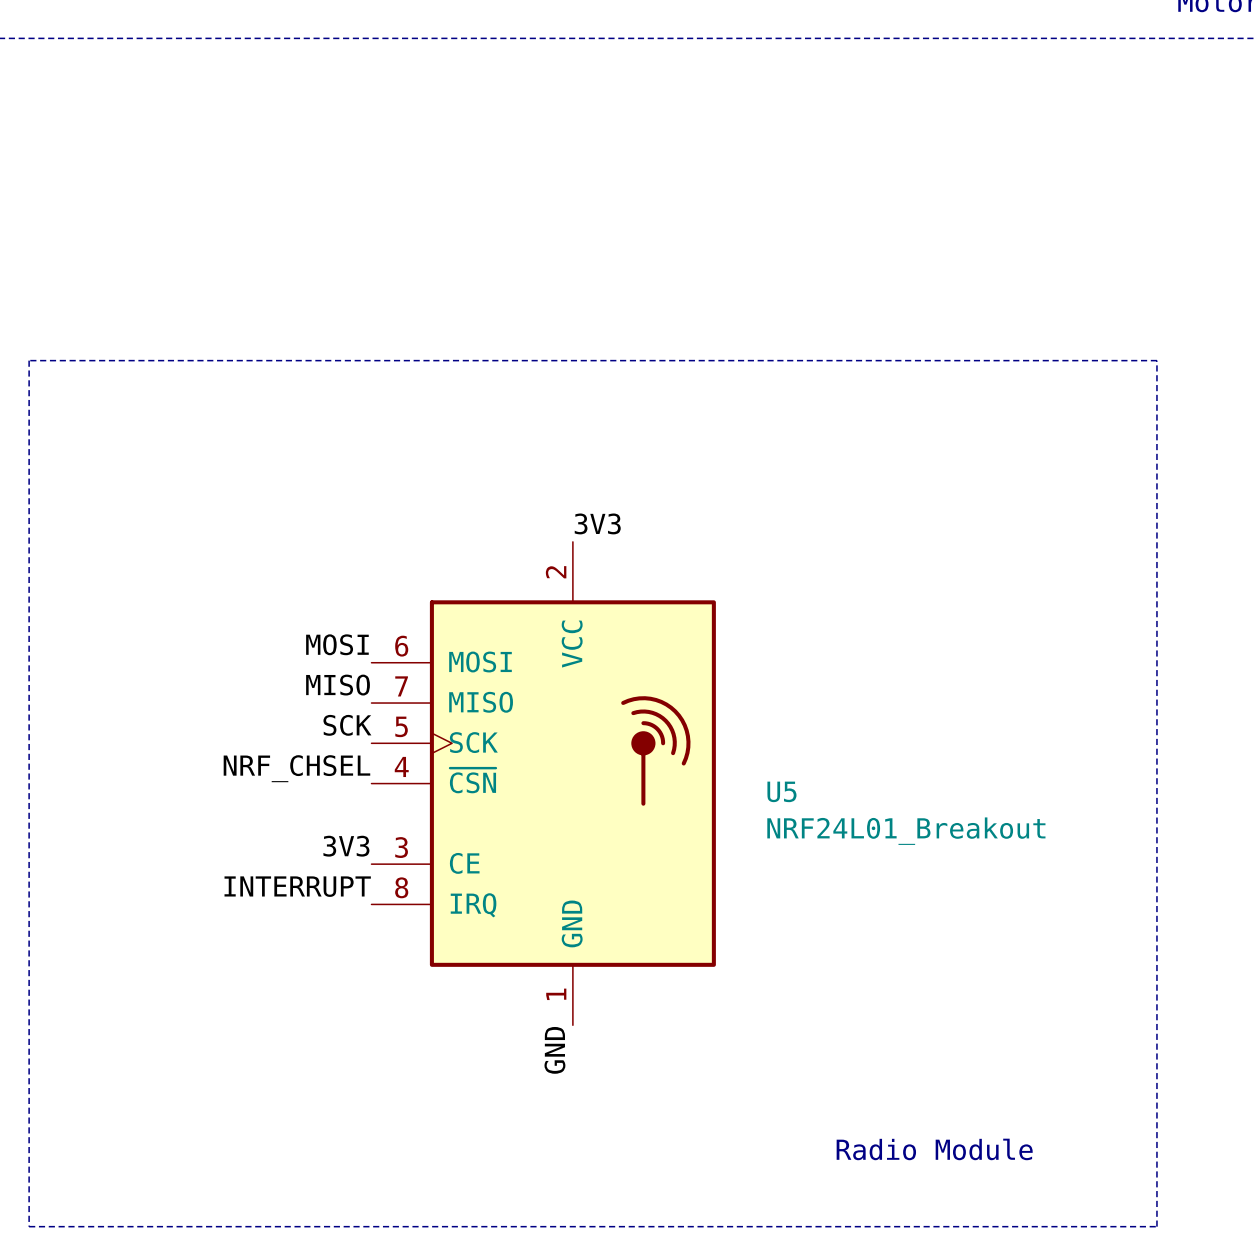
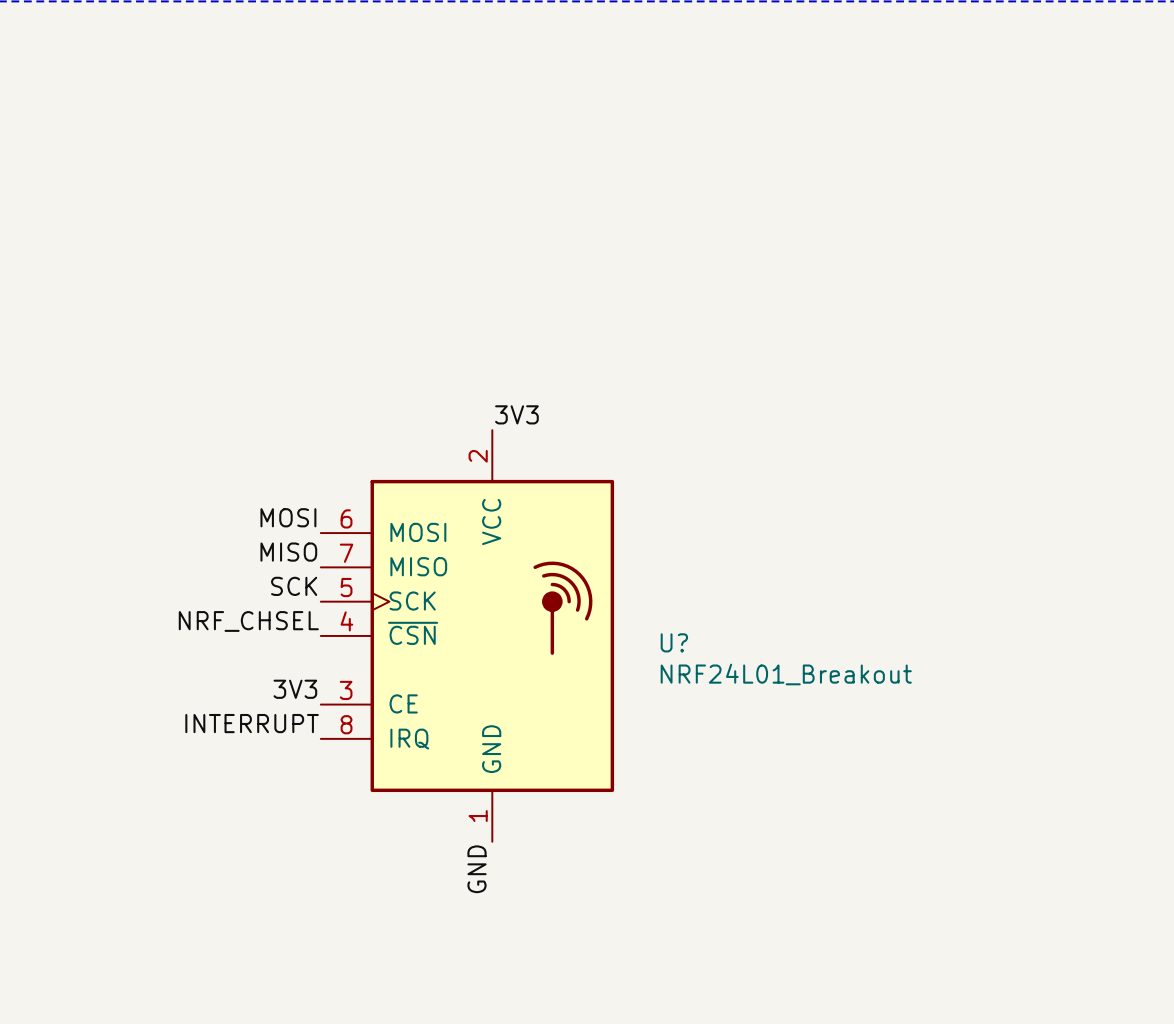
line: (29, 360) (29, 1226) (1156, 1226) (1156, 360) (29, 360) -> none
U5 name: U5 (781, 791) -> U? (674, 642)
text: Radio Module (934, 1149) -> none

